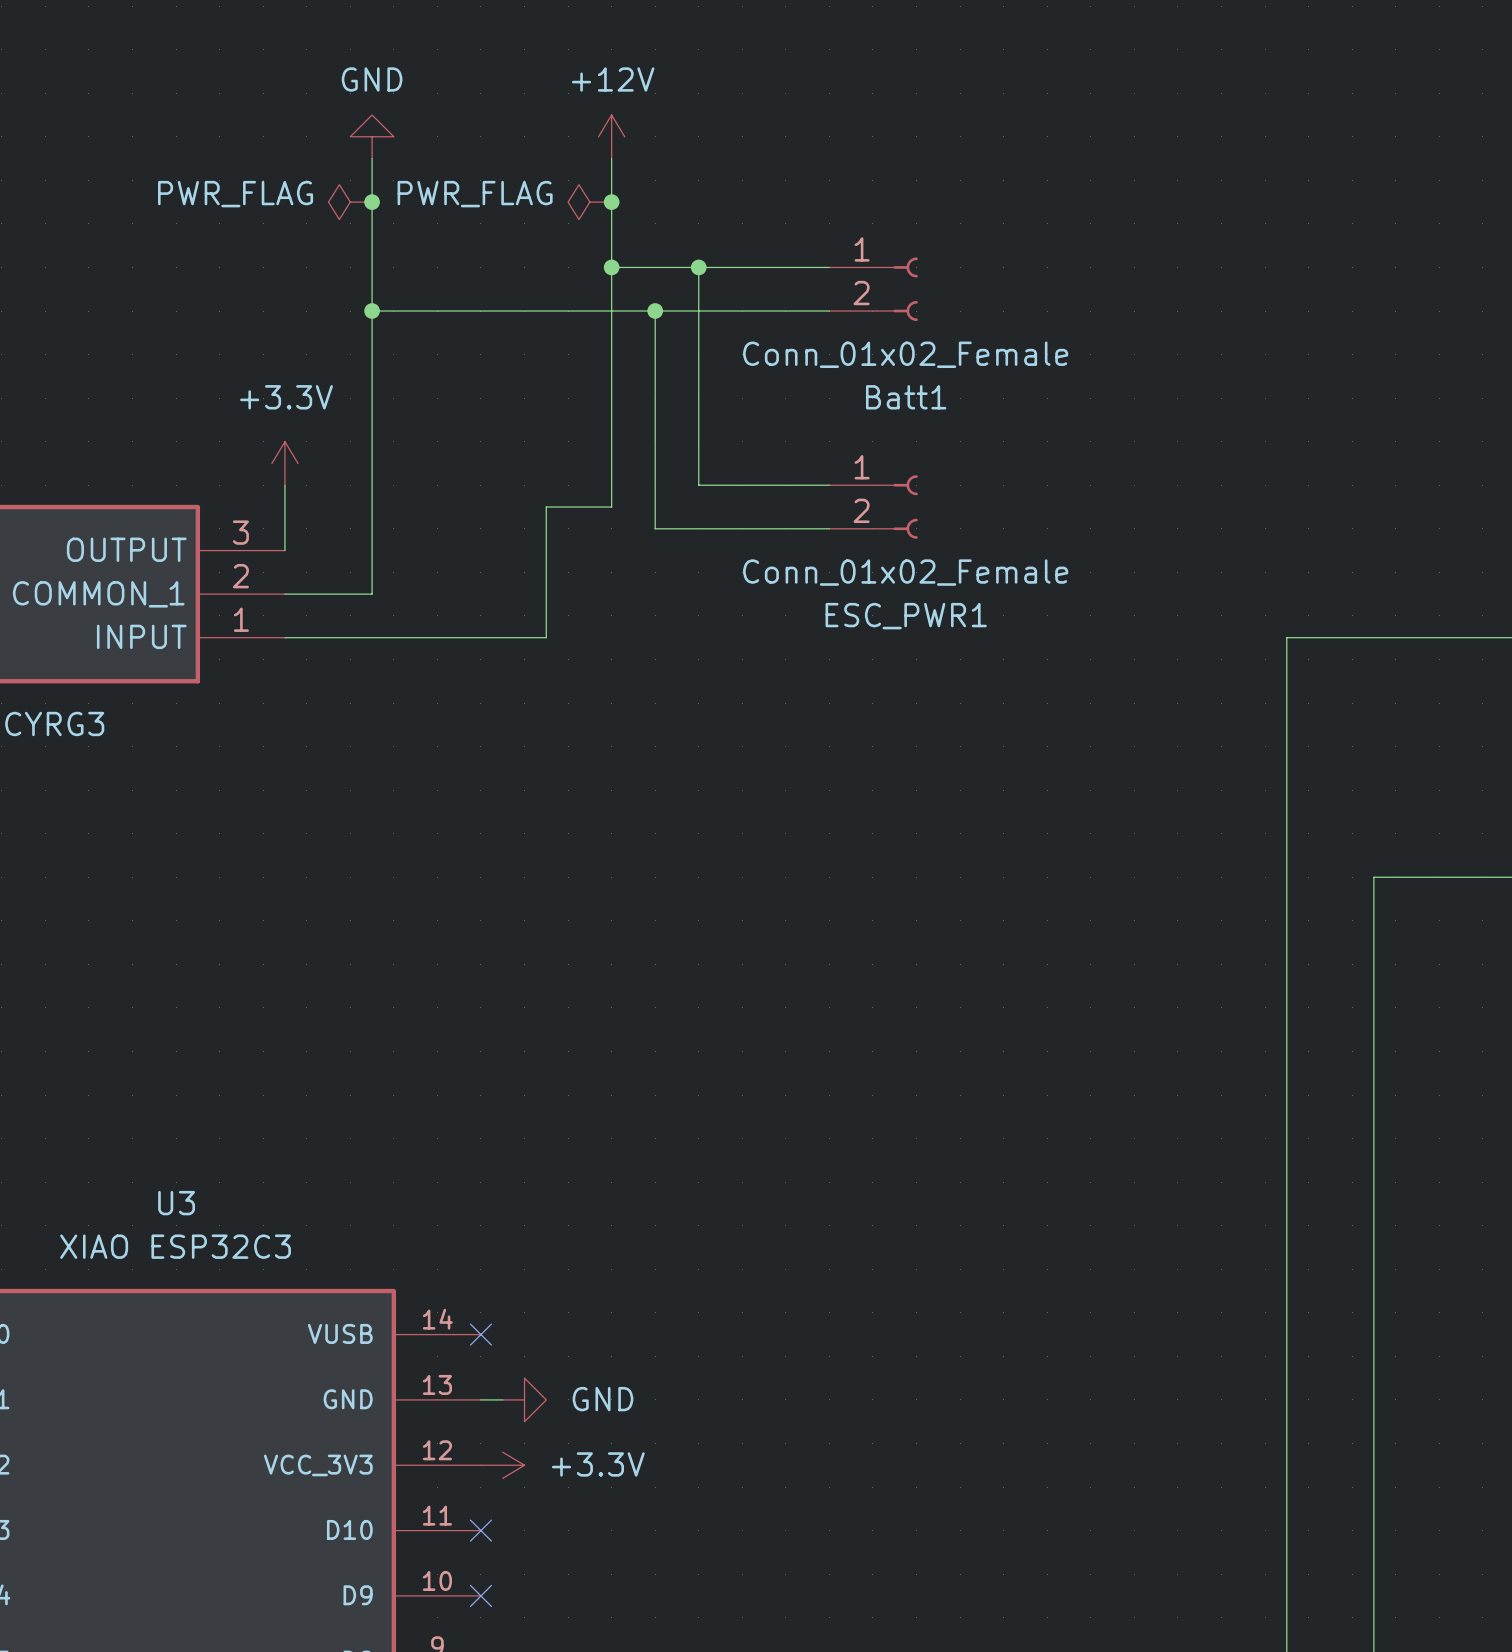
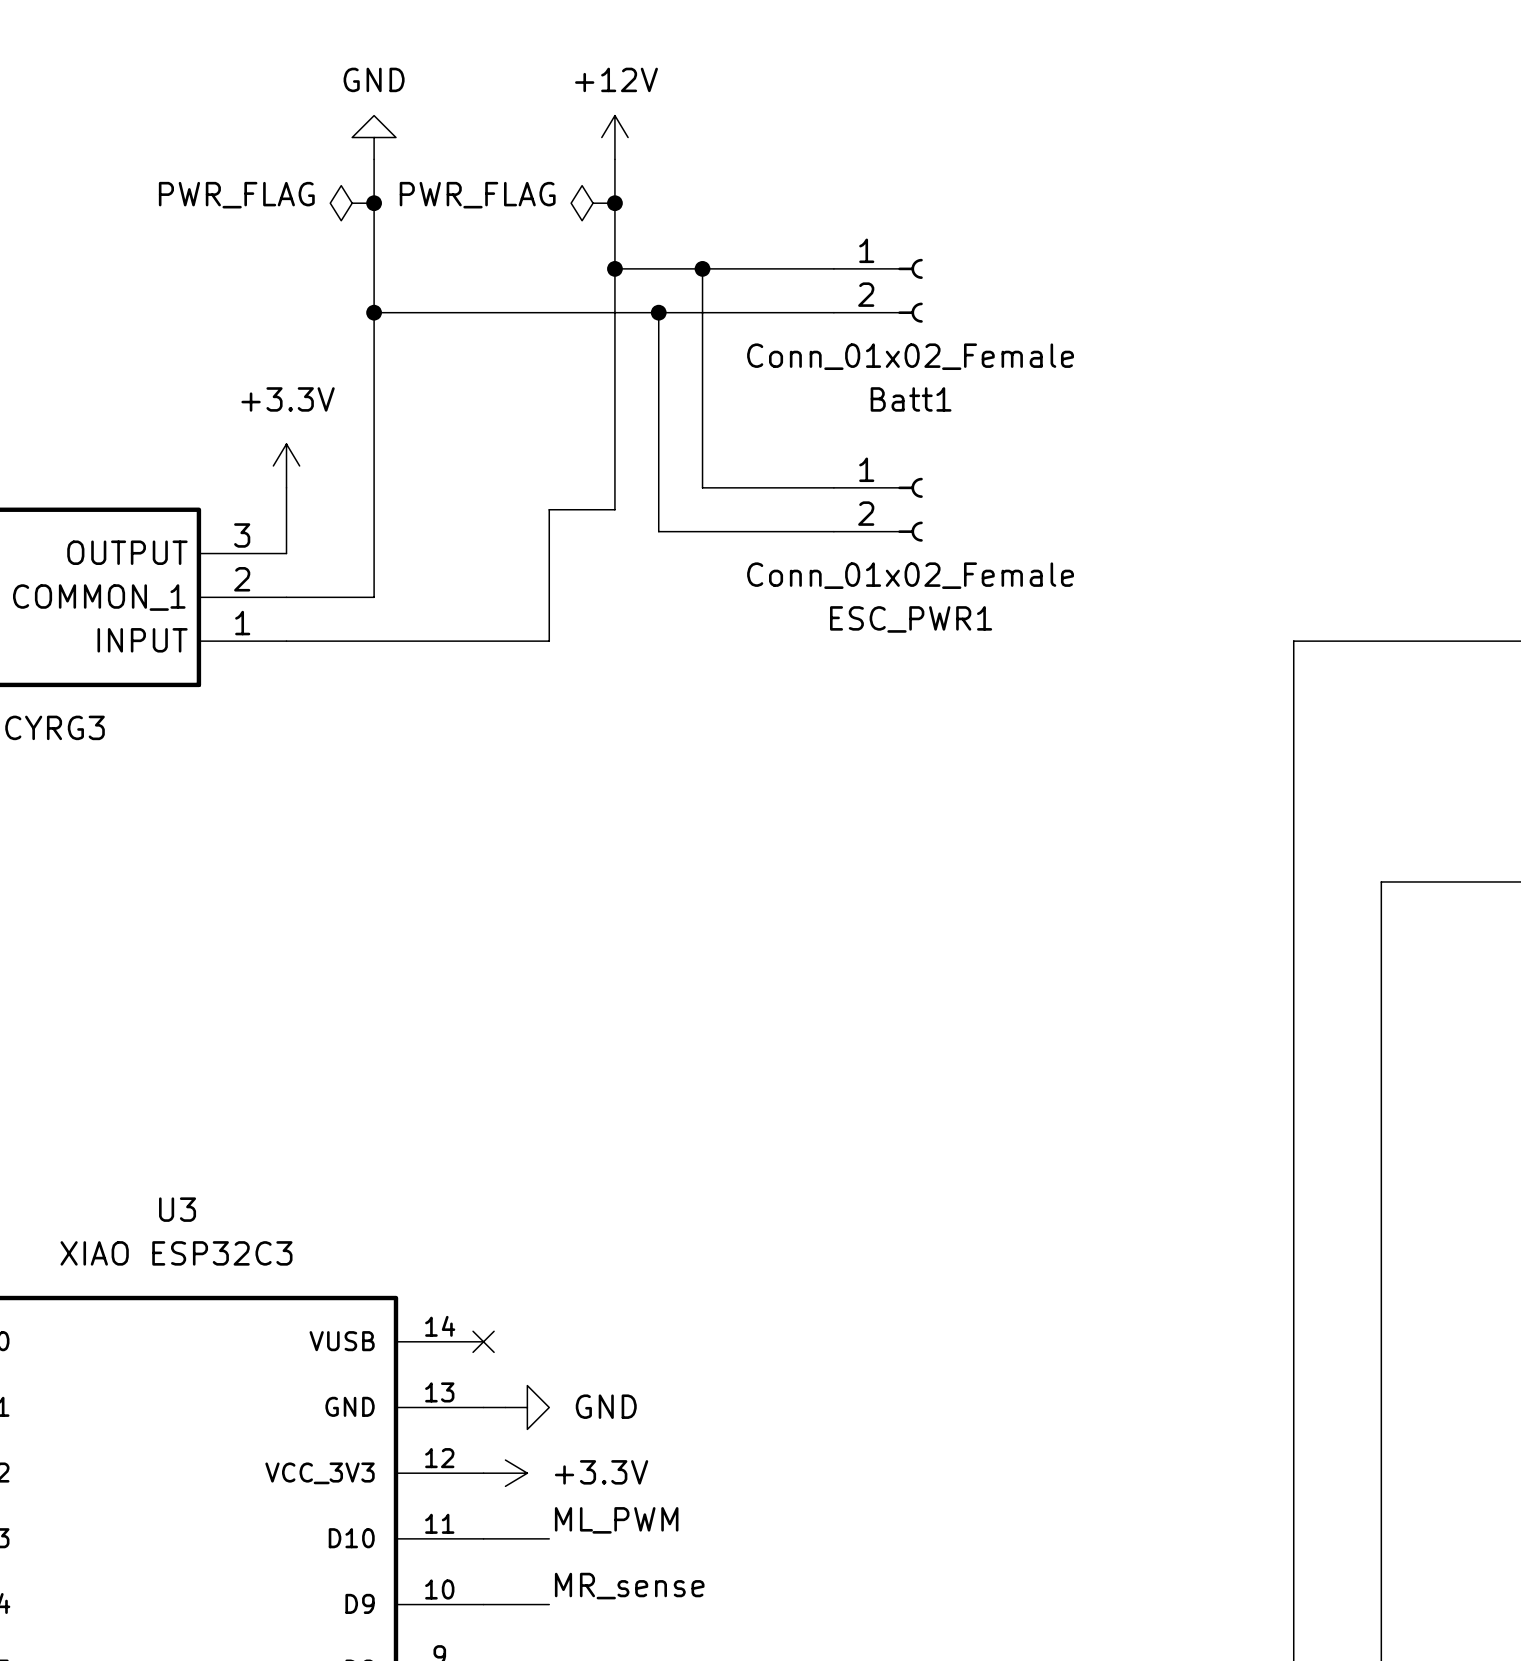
label: none -> ML_PWM (616, 1520)
wire: none -> (483, 1538) (549, 1538)
no-connect mark: (480, 1530) -> none
label: none -> MR_sense (629, 1586)
wire: none -> (483, 1604) (549, 1604)
no-connect mark: (480, 1595) -> none

